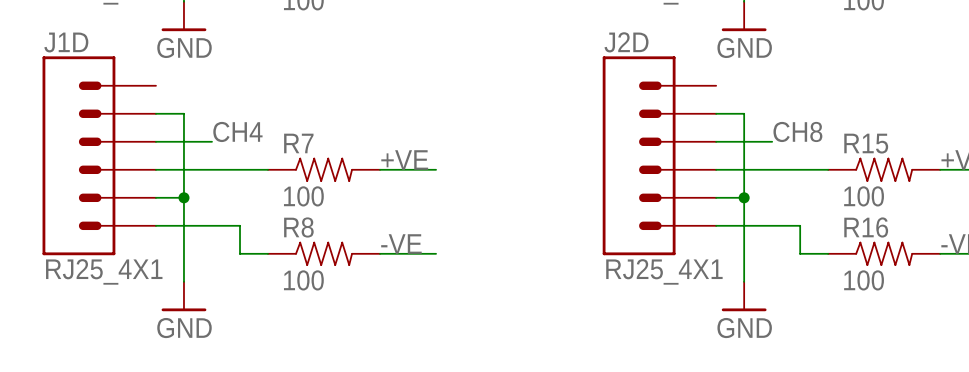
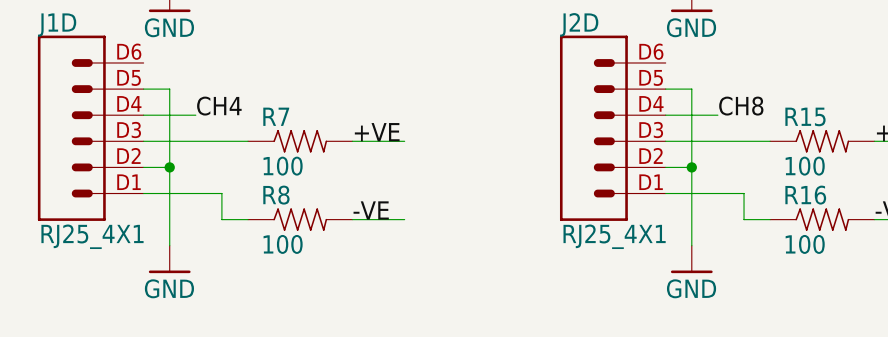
J1D pin number: none -> D6 (129, 51)
J2D pin number: none -> D6 (651, 51)
J1D pin number: none -> D5 (129, 77)
J2D pin number: none -> D5 (651, 77)
J1D pin number: none -> D4 (129, 103)
J2D pin number: none -> D4 (651, 103)
J1D pin number: none -> D3 (129, 130)
J2D pin number: none -> D3 (651, 130)
J1D pin number: none -> D2 (128, 155)
J2D pin number: none -> D2 (651, 155)
J1D pin number: none -> D1 (129, 182)
J2D pin number: none -> D1 (651, 182)

